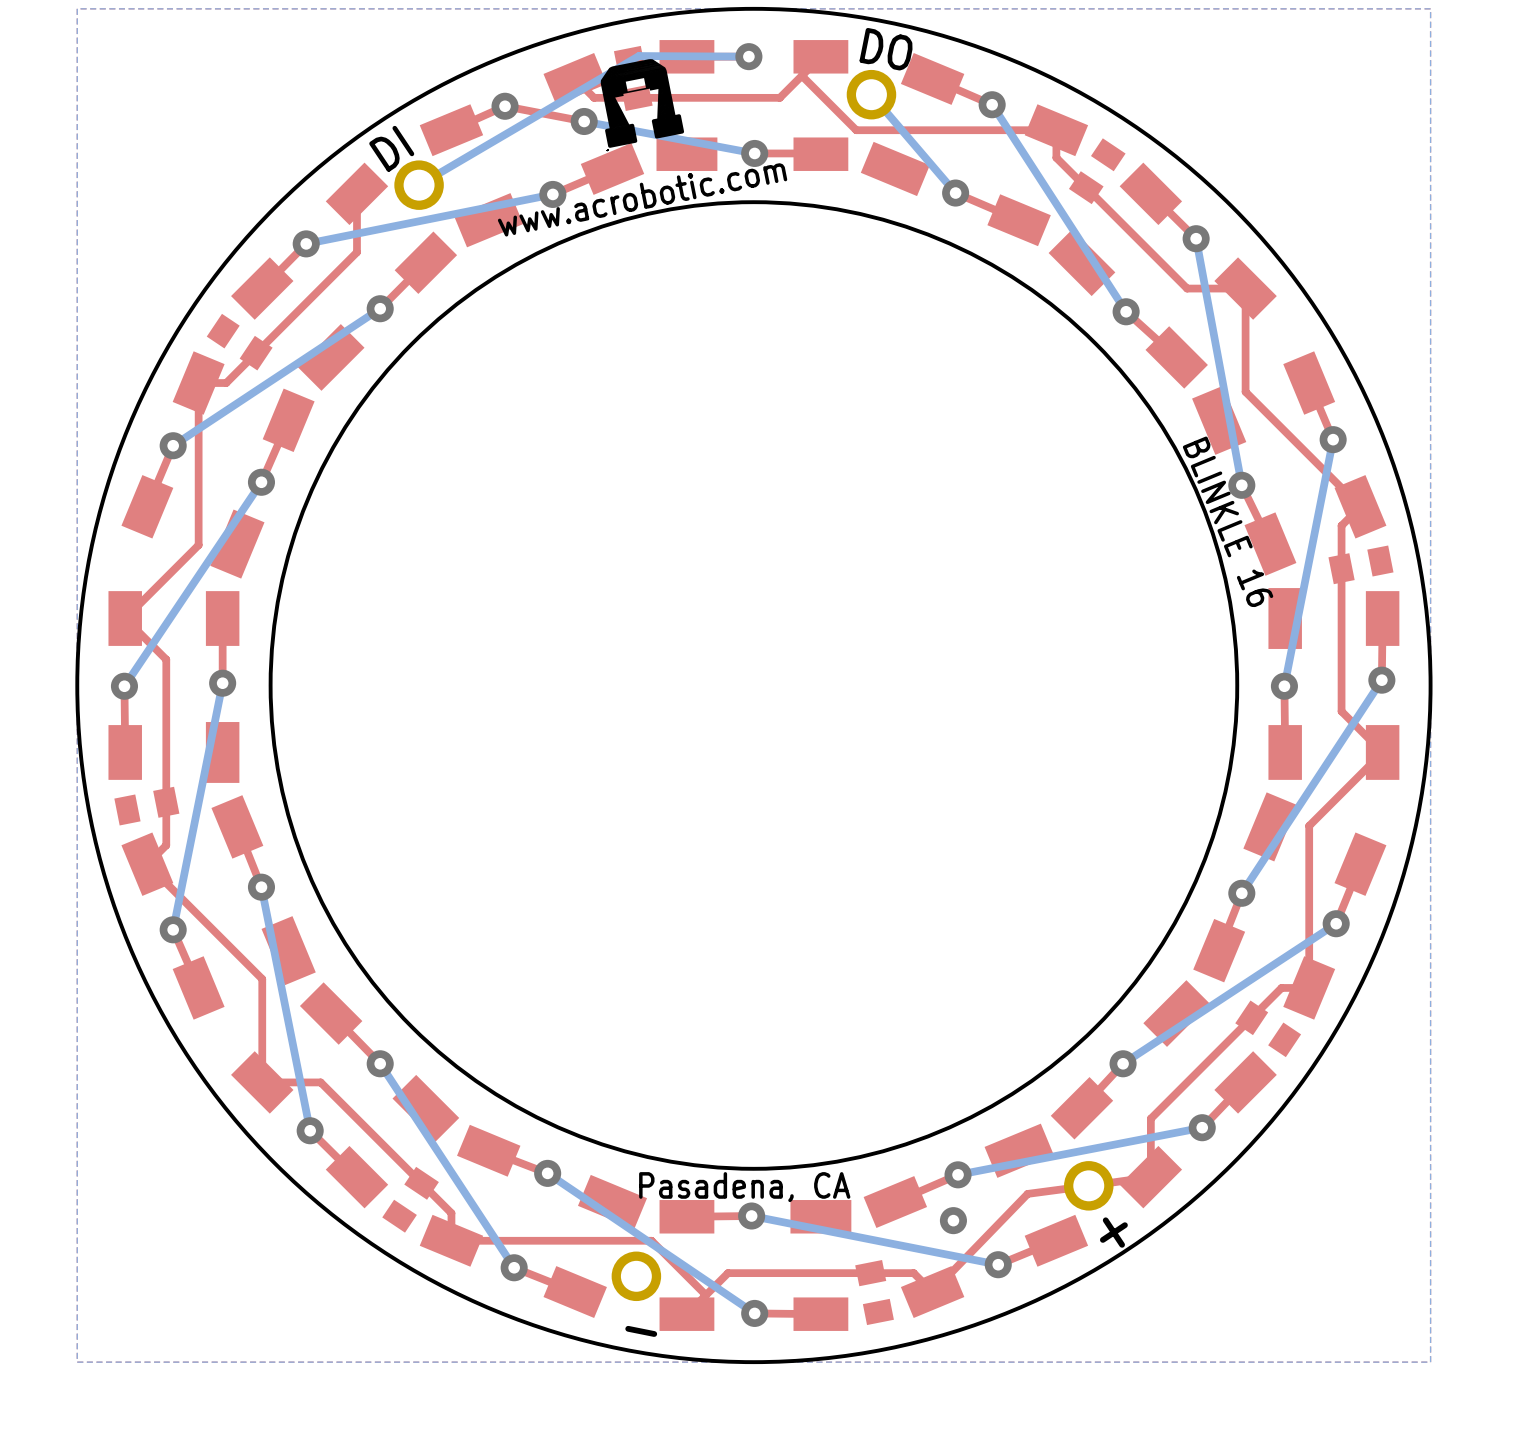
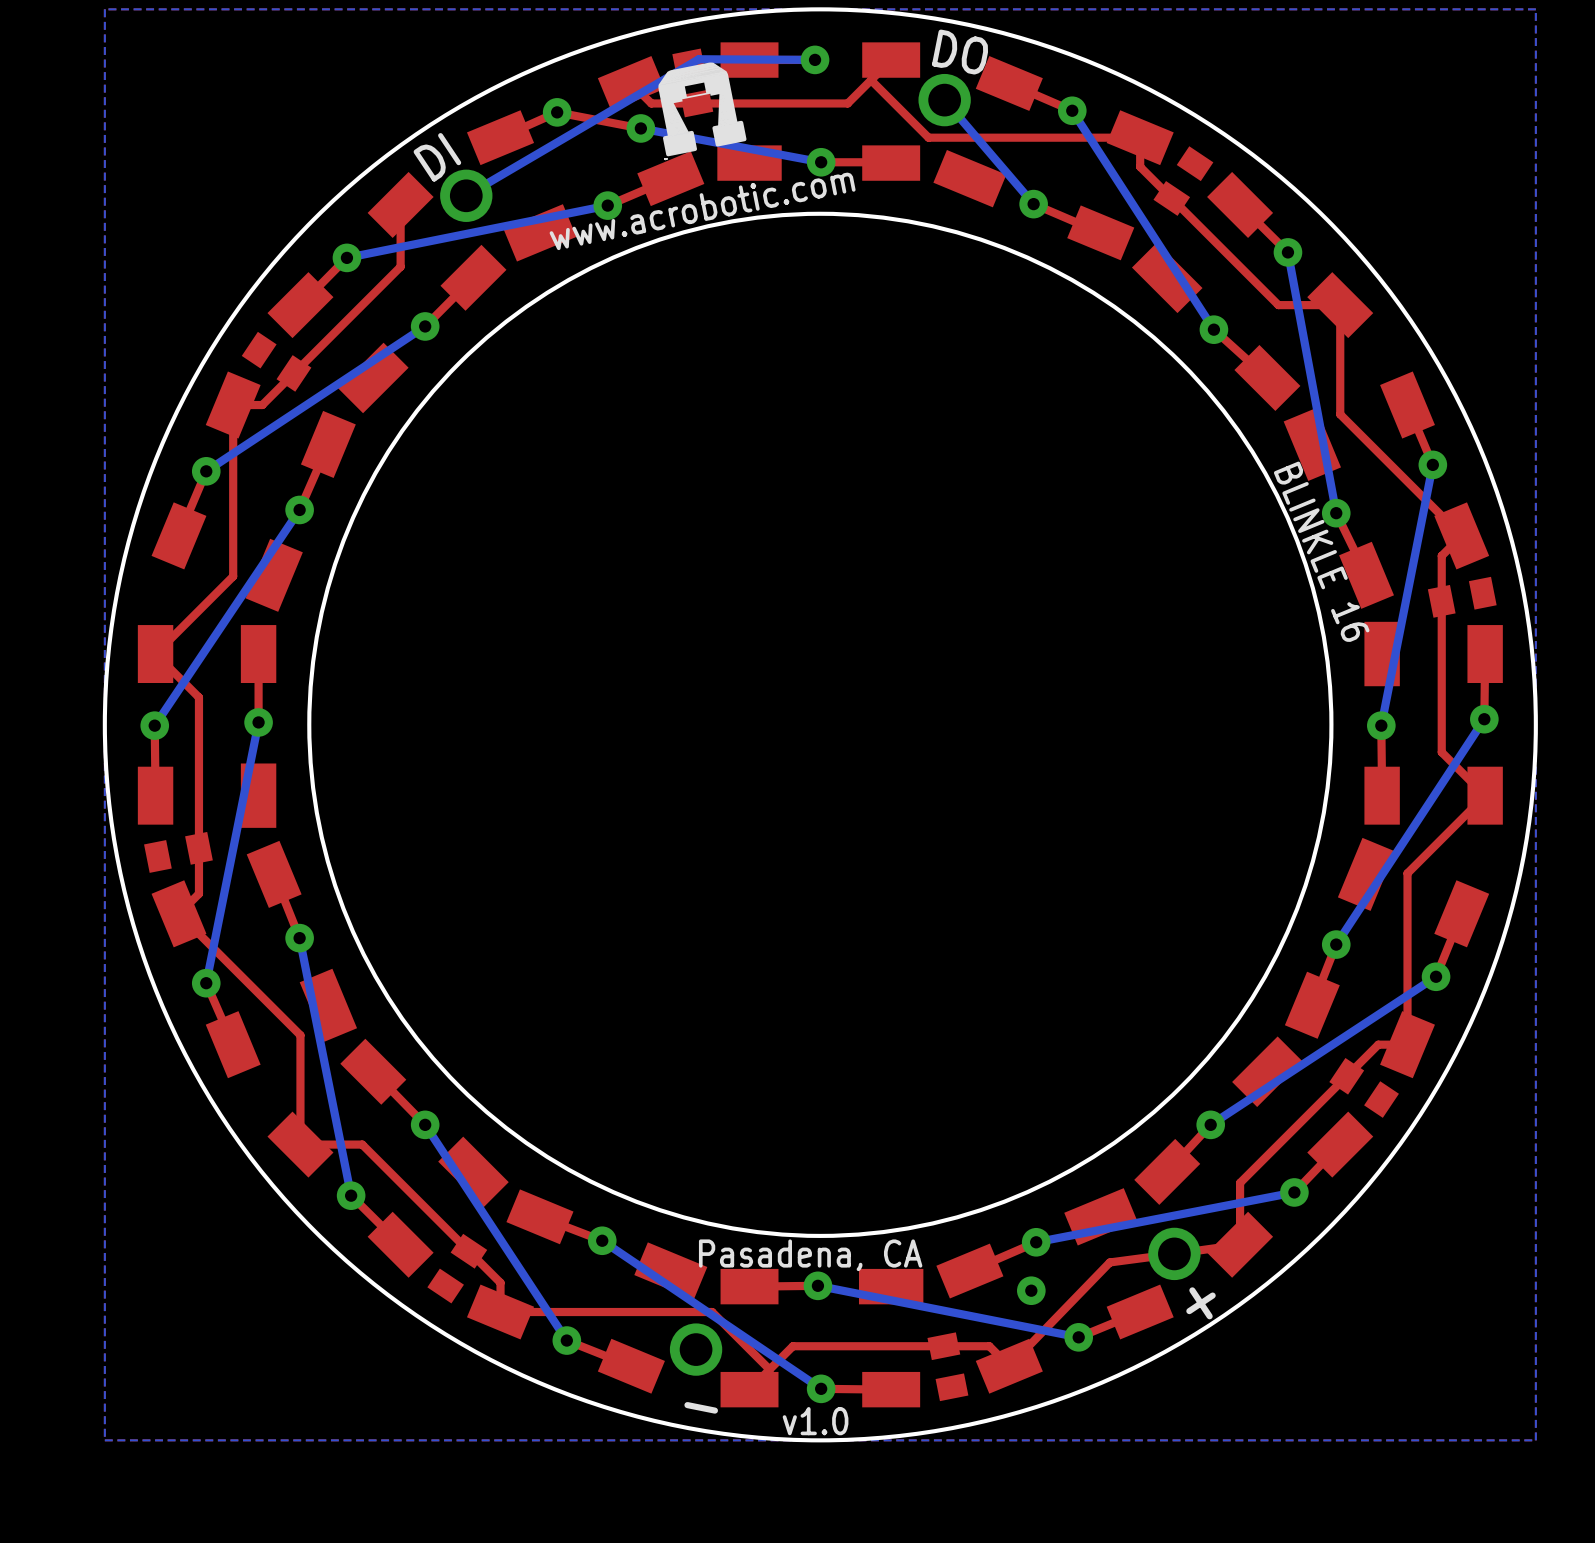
text: none -> v1.0 (815, 1421)

